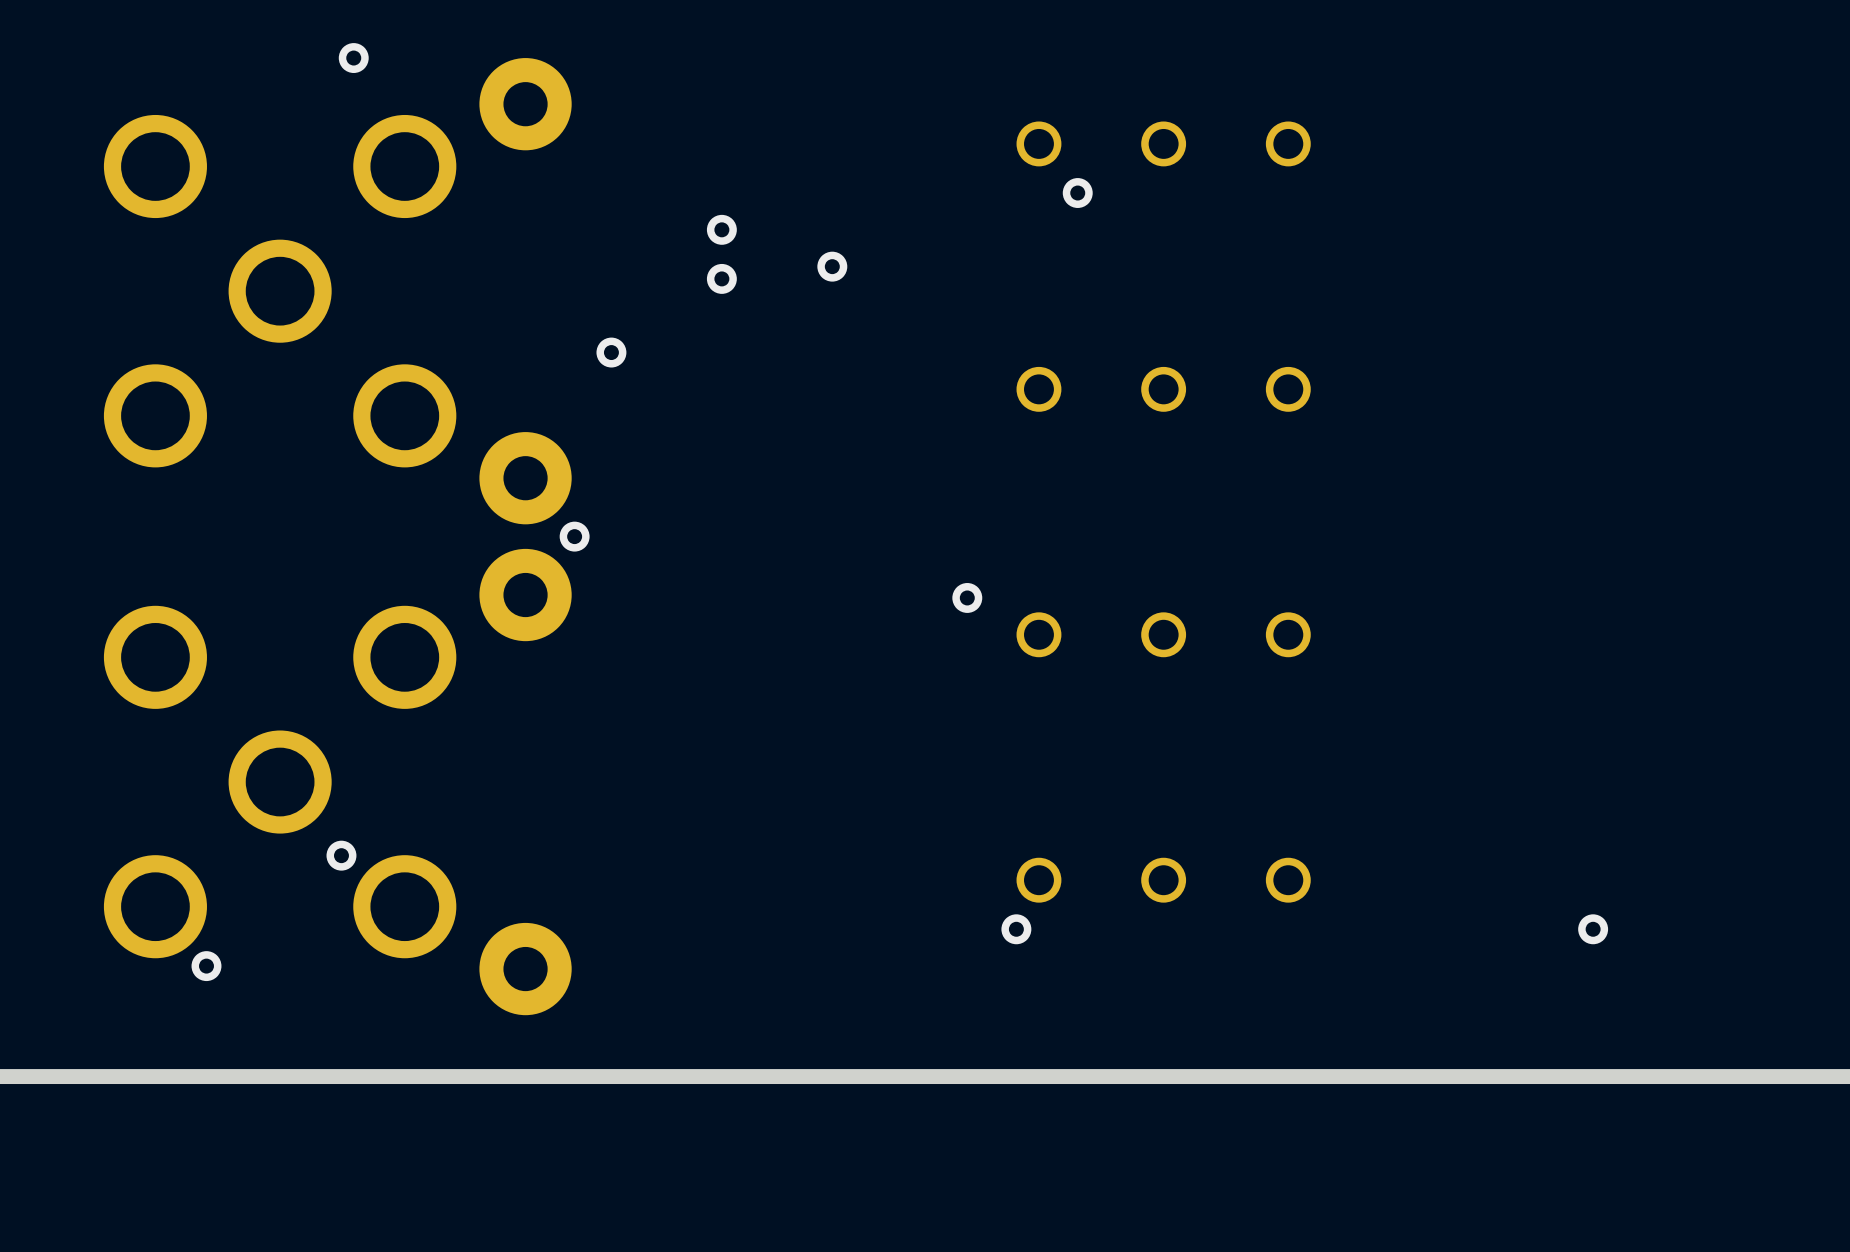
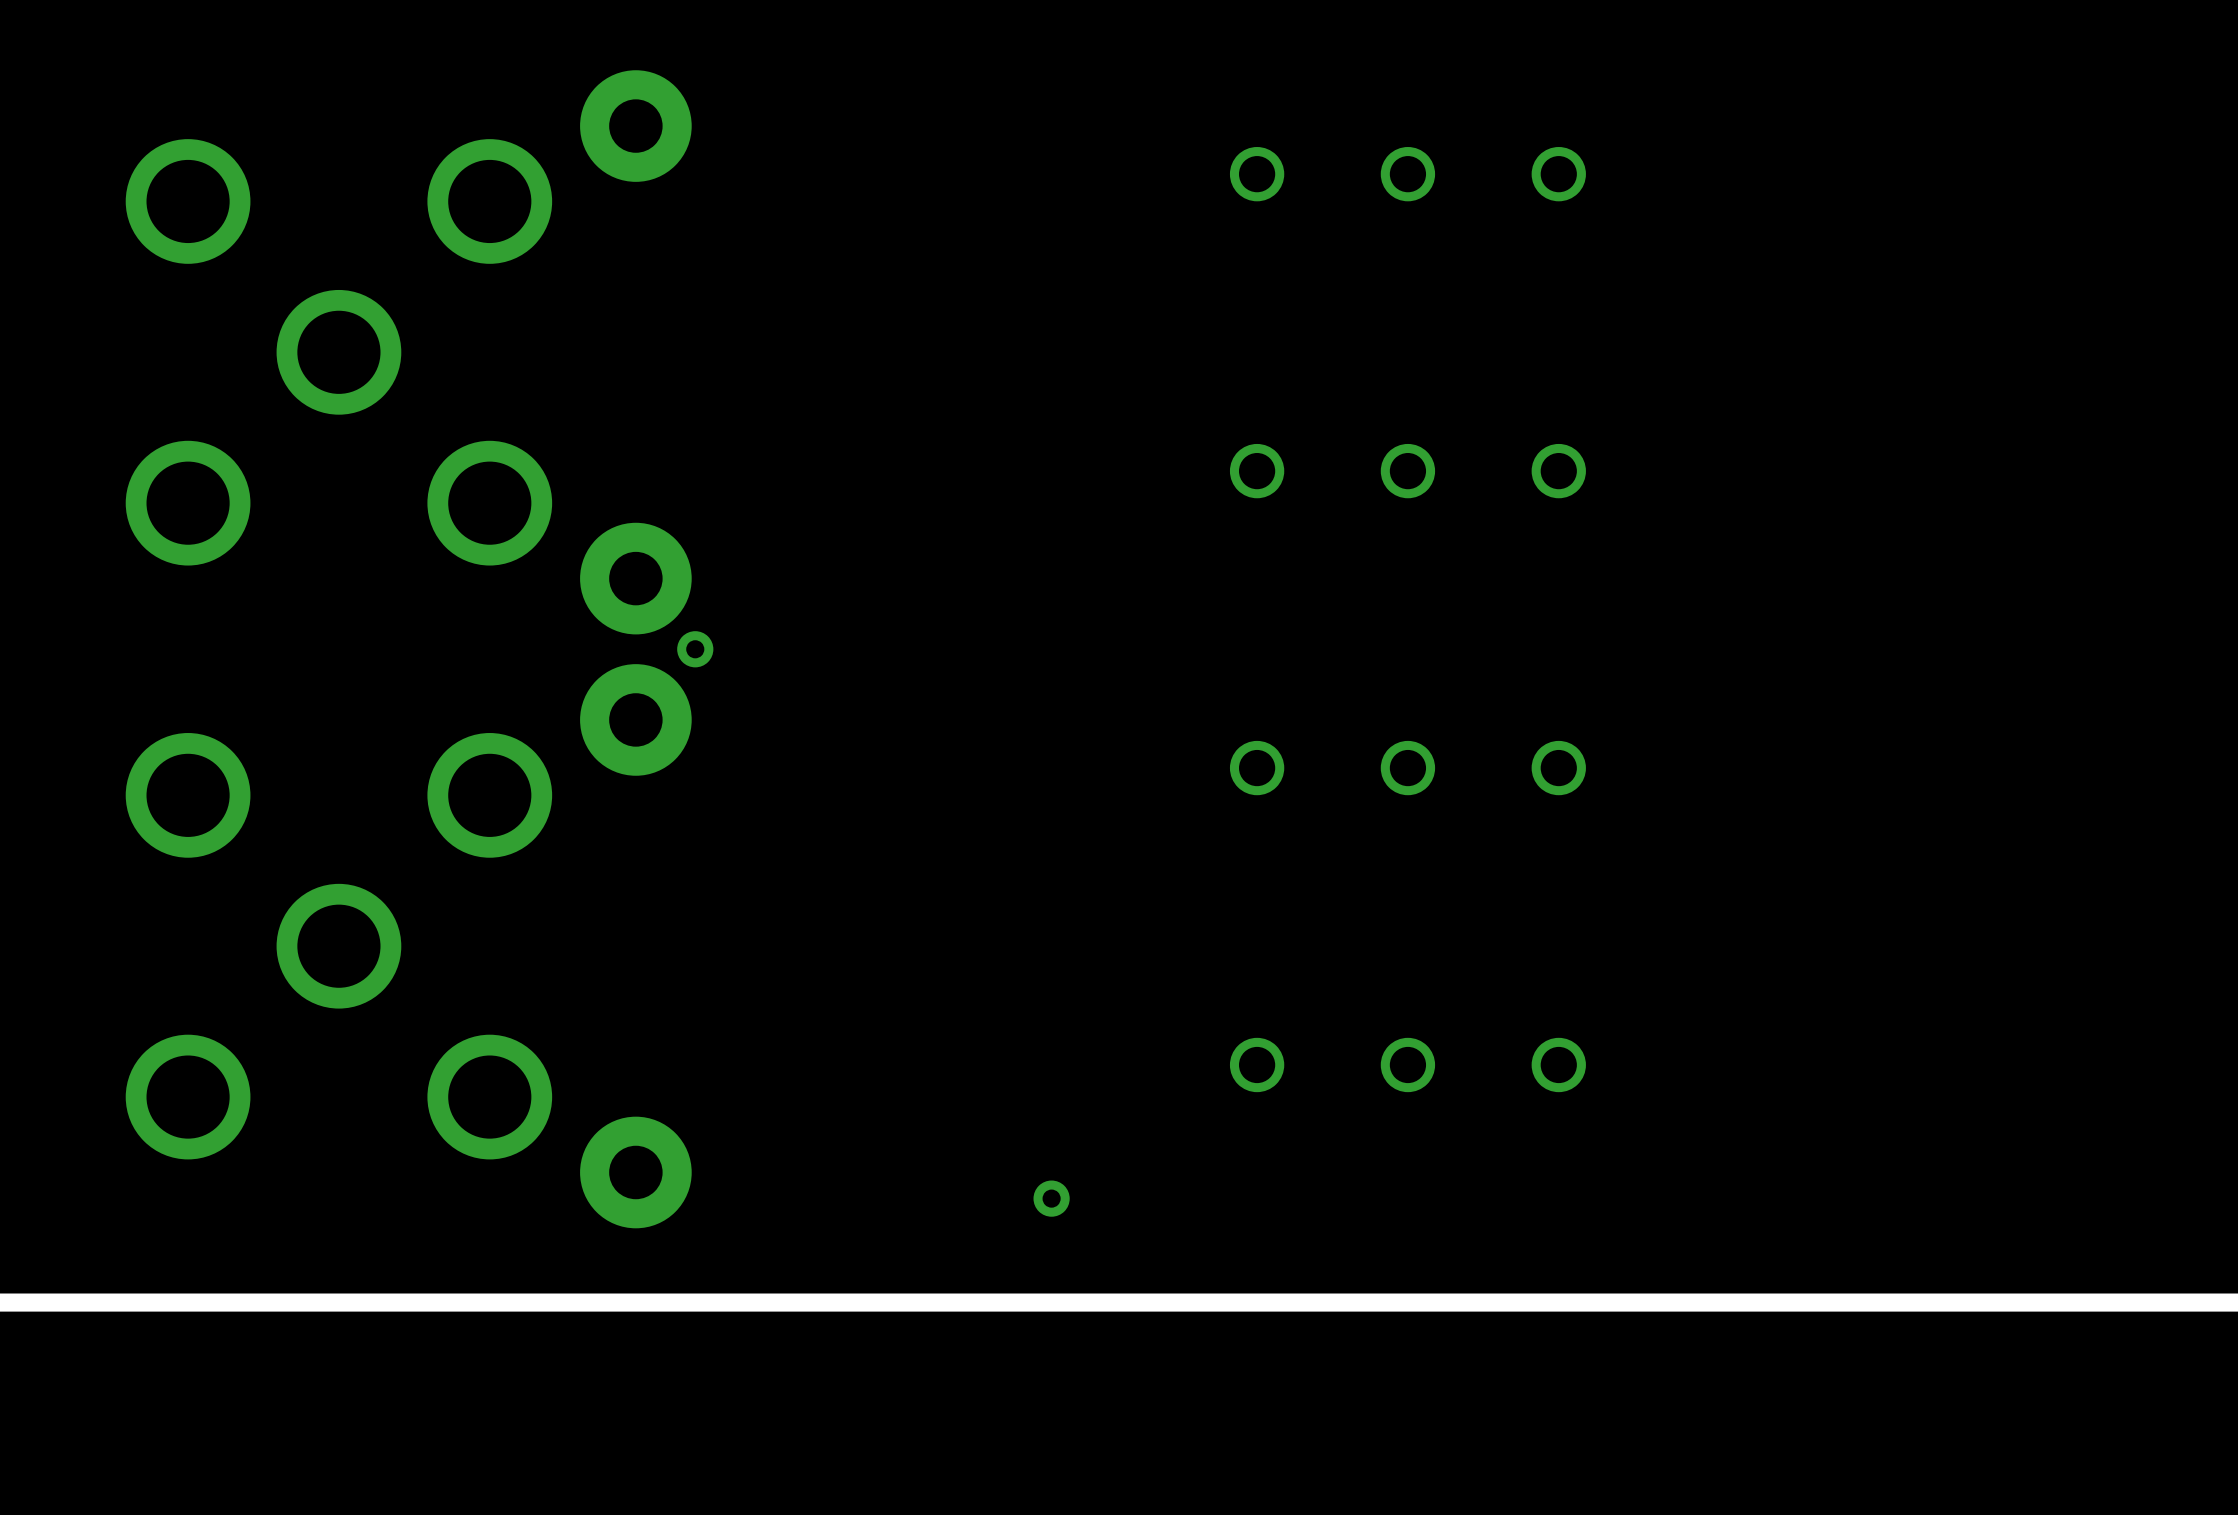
via: (353, 58) -> none
via: (1077, 193) -> none
via: (721, 229) -> none
via: (832, 266) -> none
via: (721, 278) -> none
via: (611, 352) -> none
via: (967, 597) -> none
via: (341, 855) -> none
via position: (1016, 929) -> (1051, 1198)
via: (1593, 929) -> none
via: (206, 966) -> none

